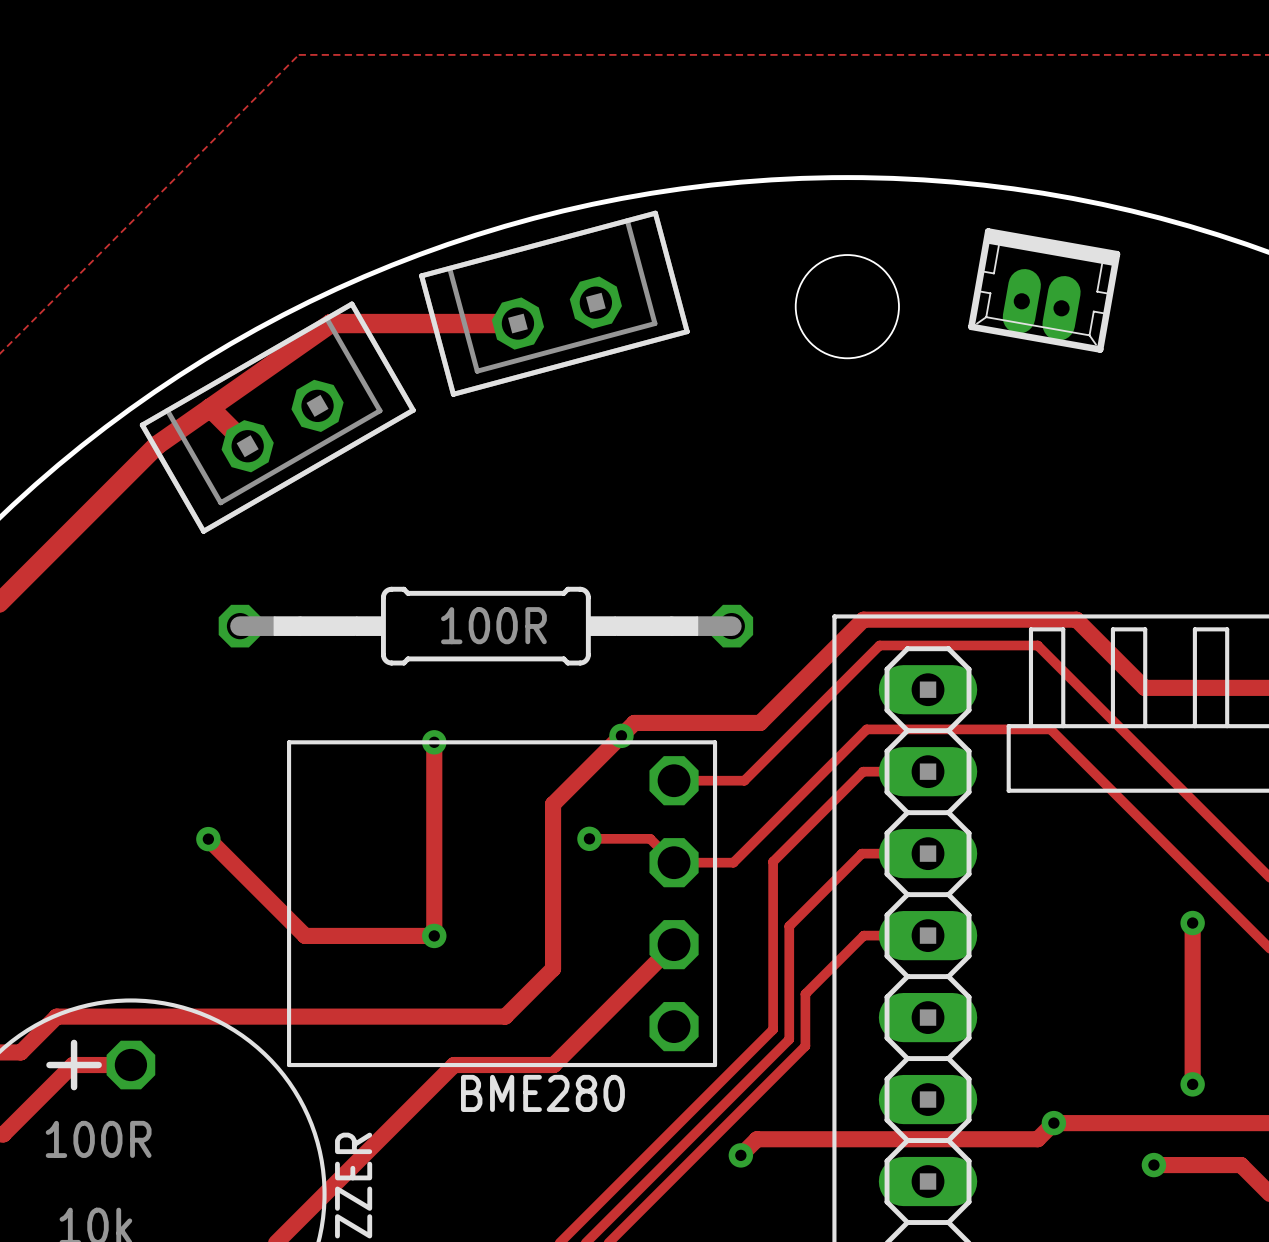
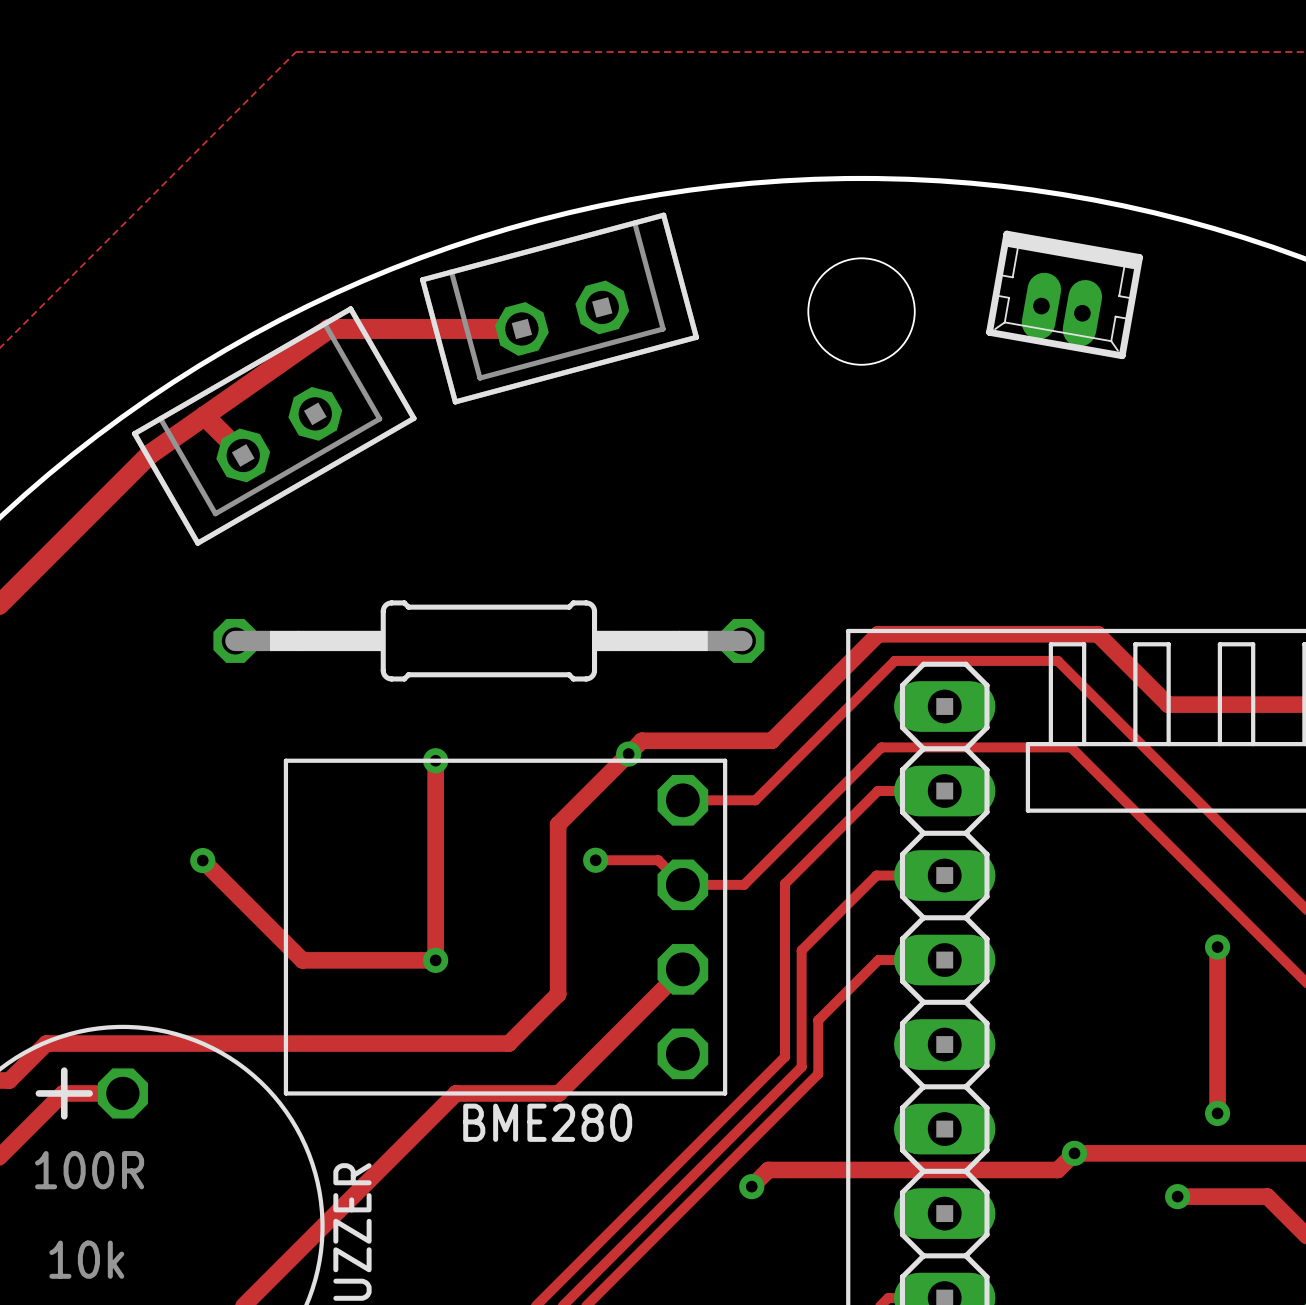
part value: 100R (493, 625) -> none

